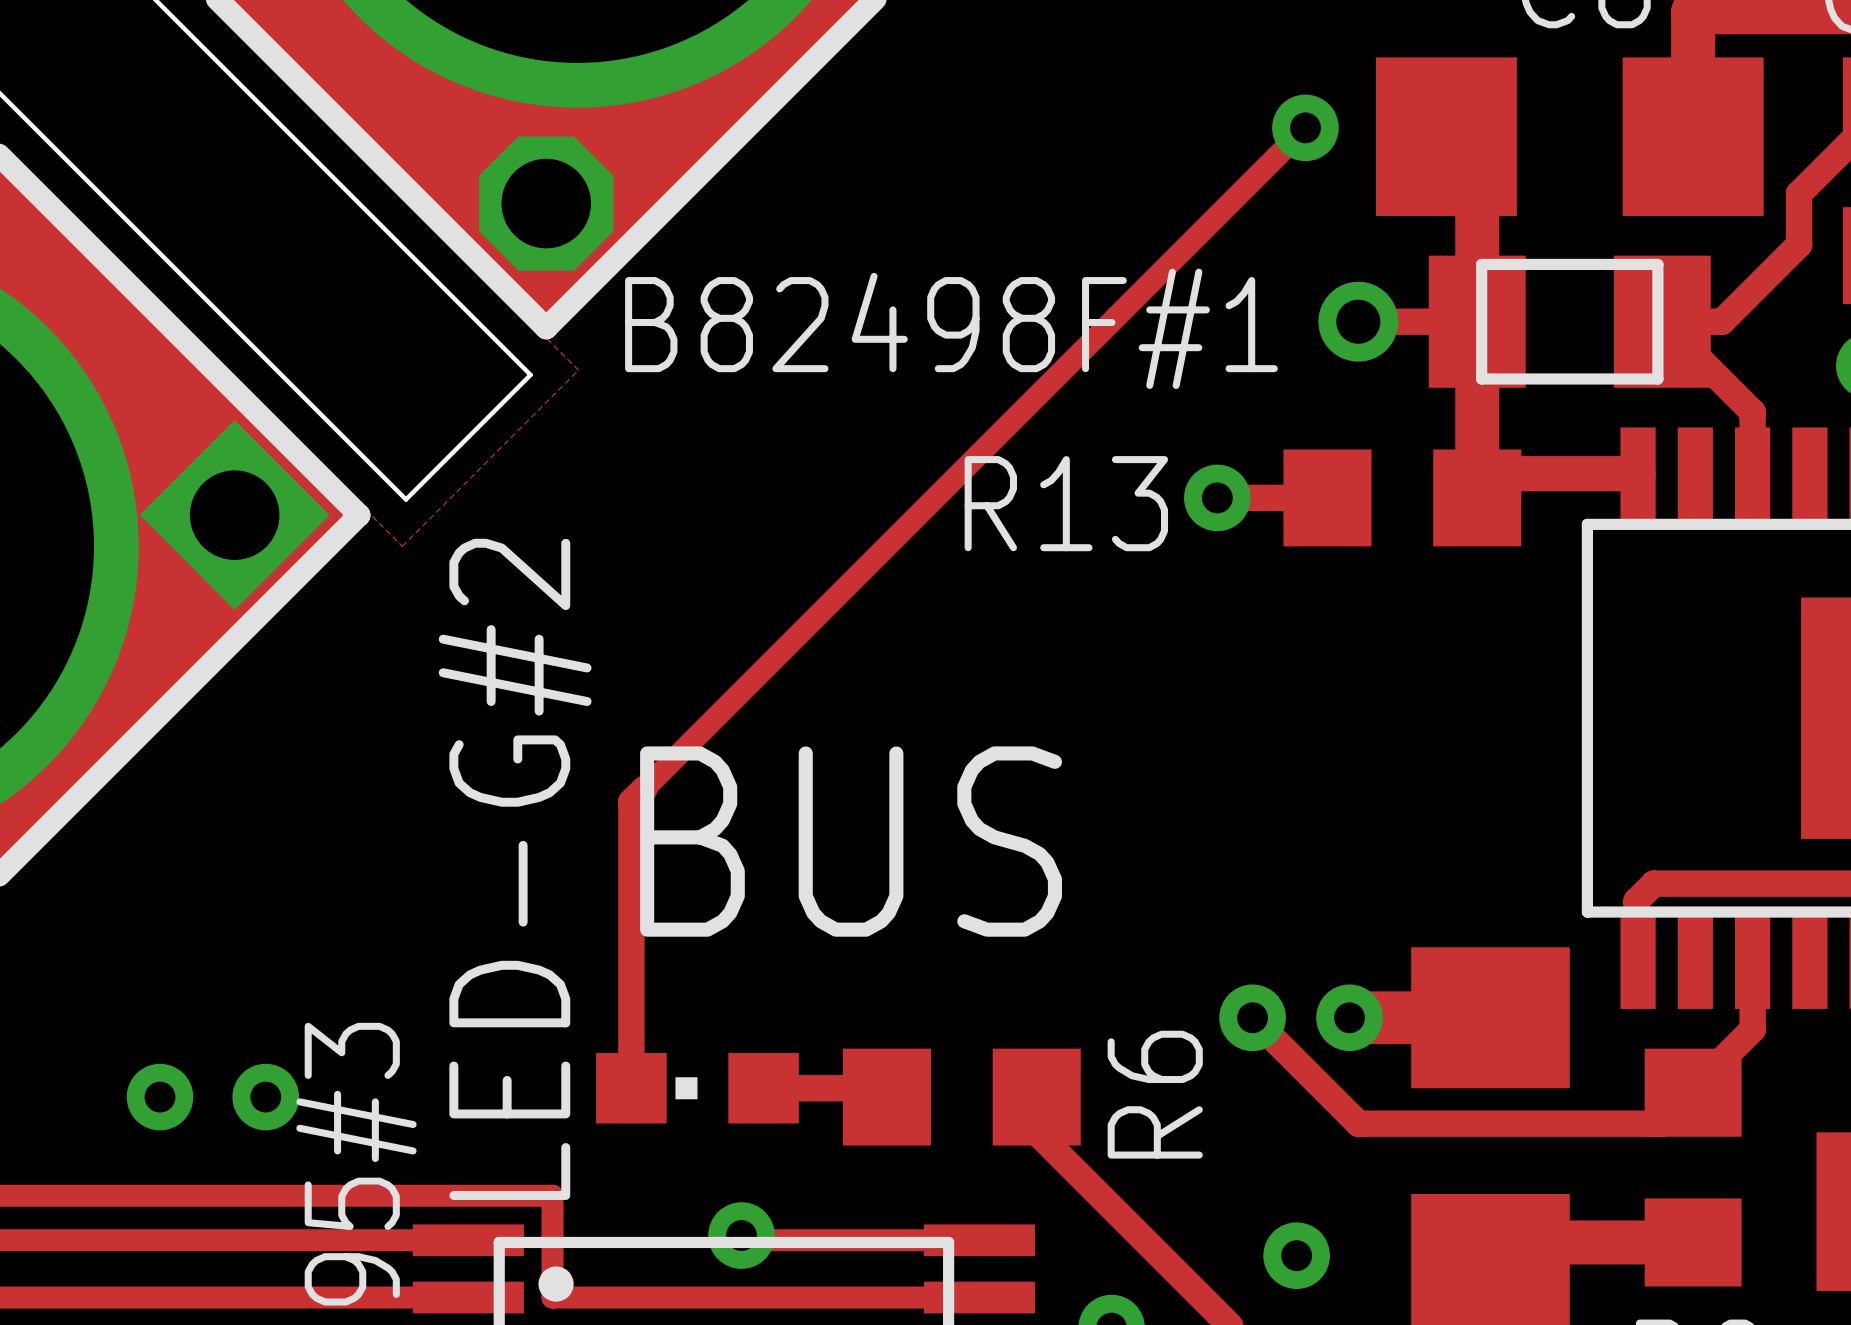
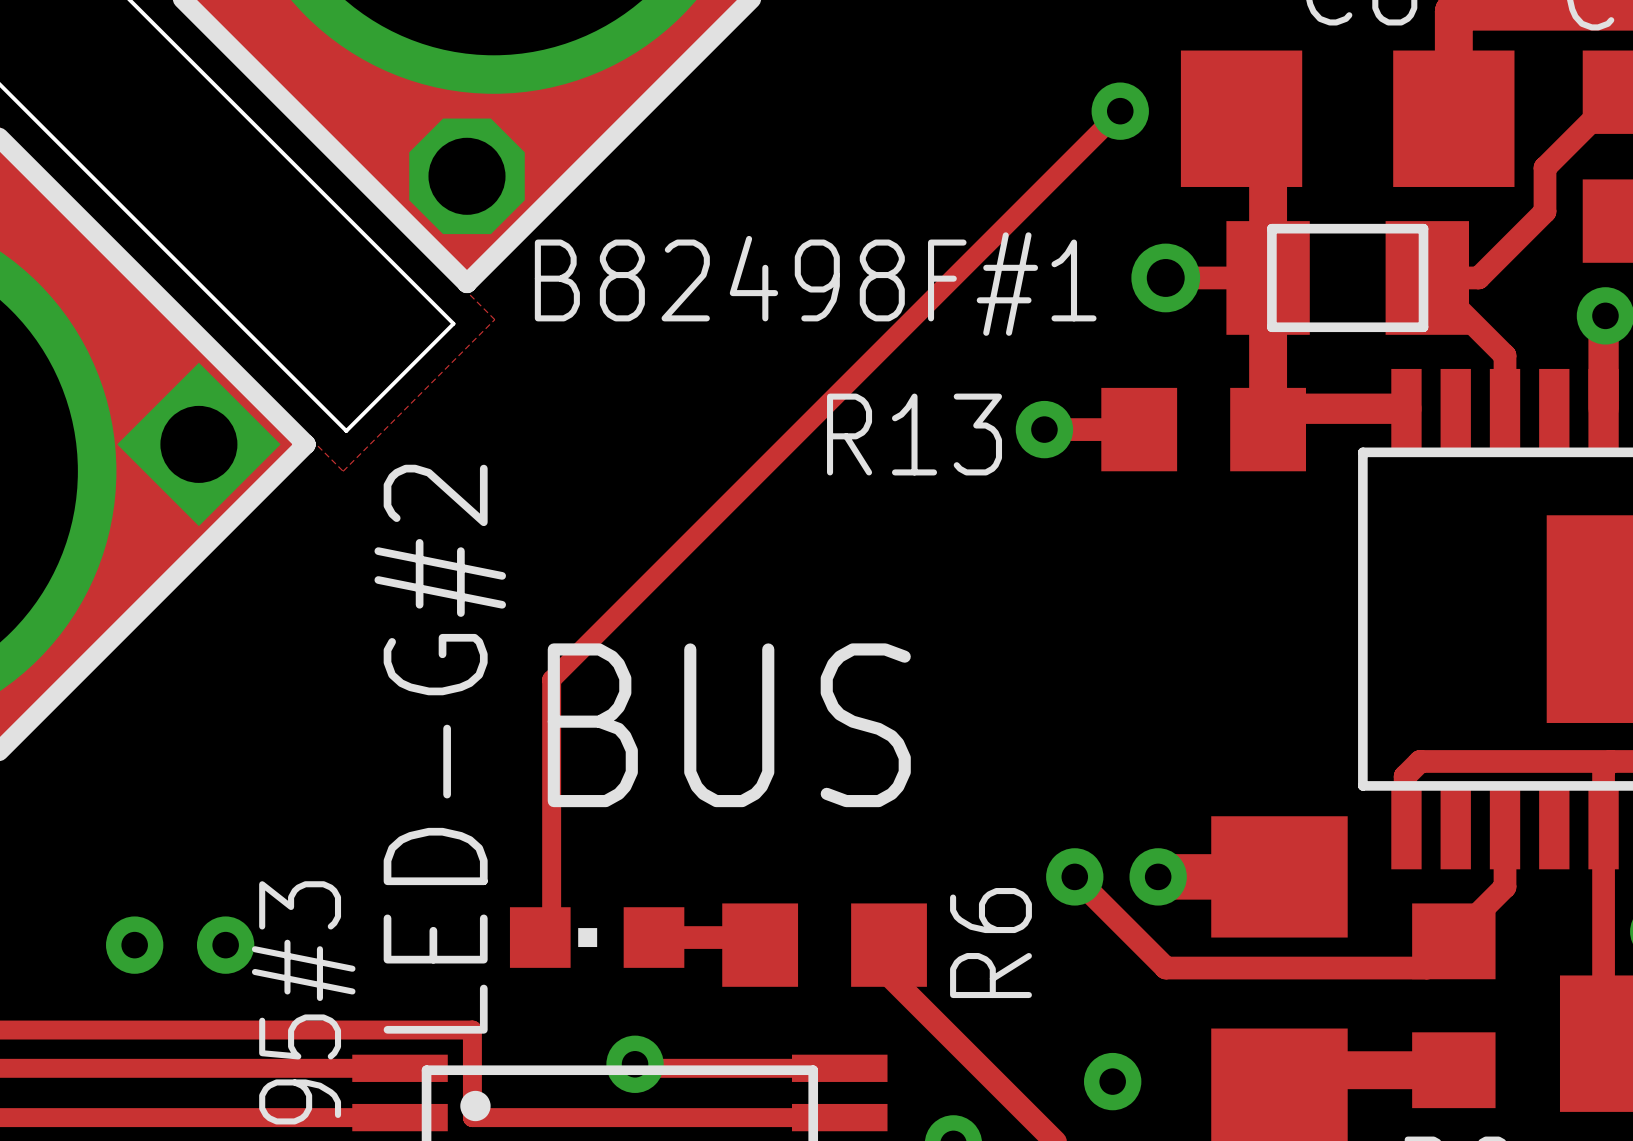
track: (644, 788) (631, 801) (631, 1088) -> (551, 679) (551, 945) (540, 945)

